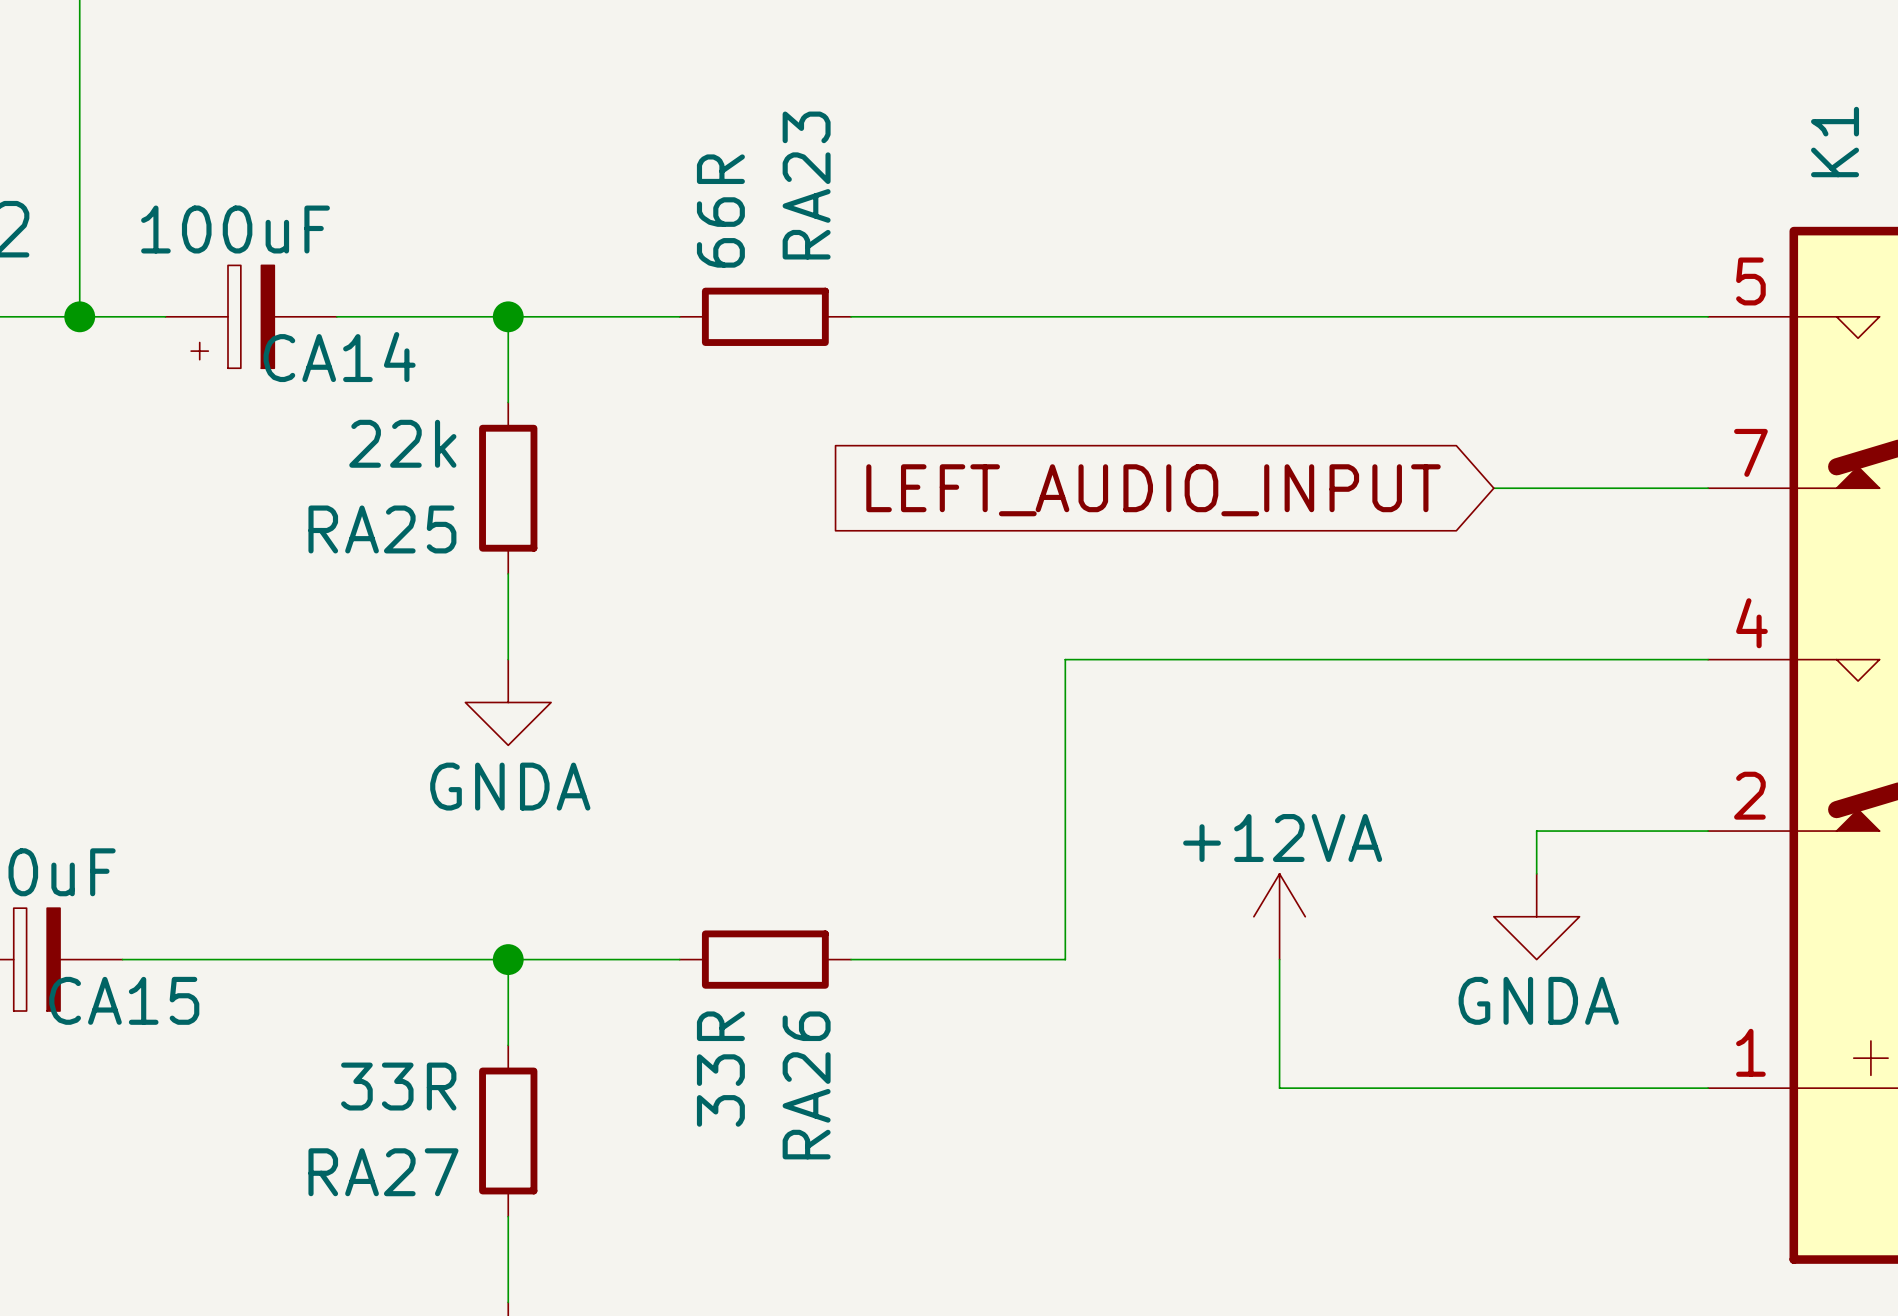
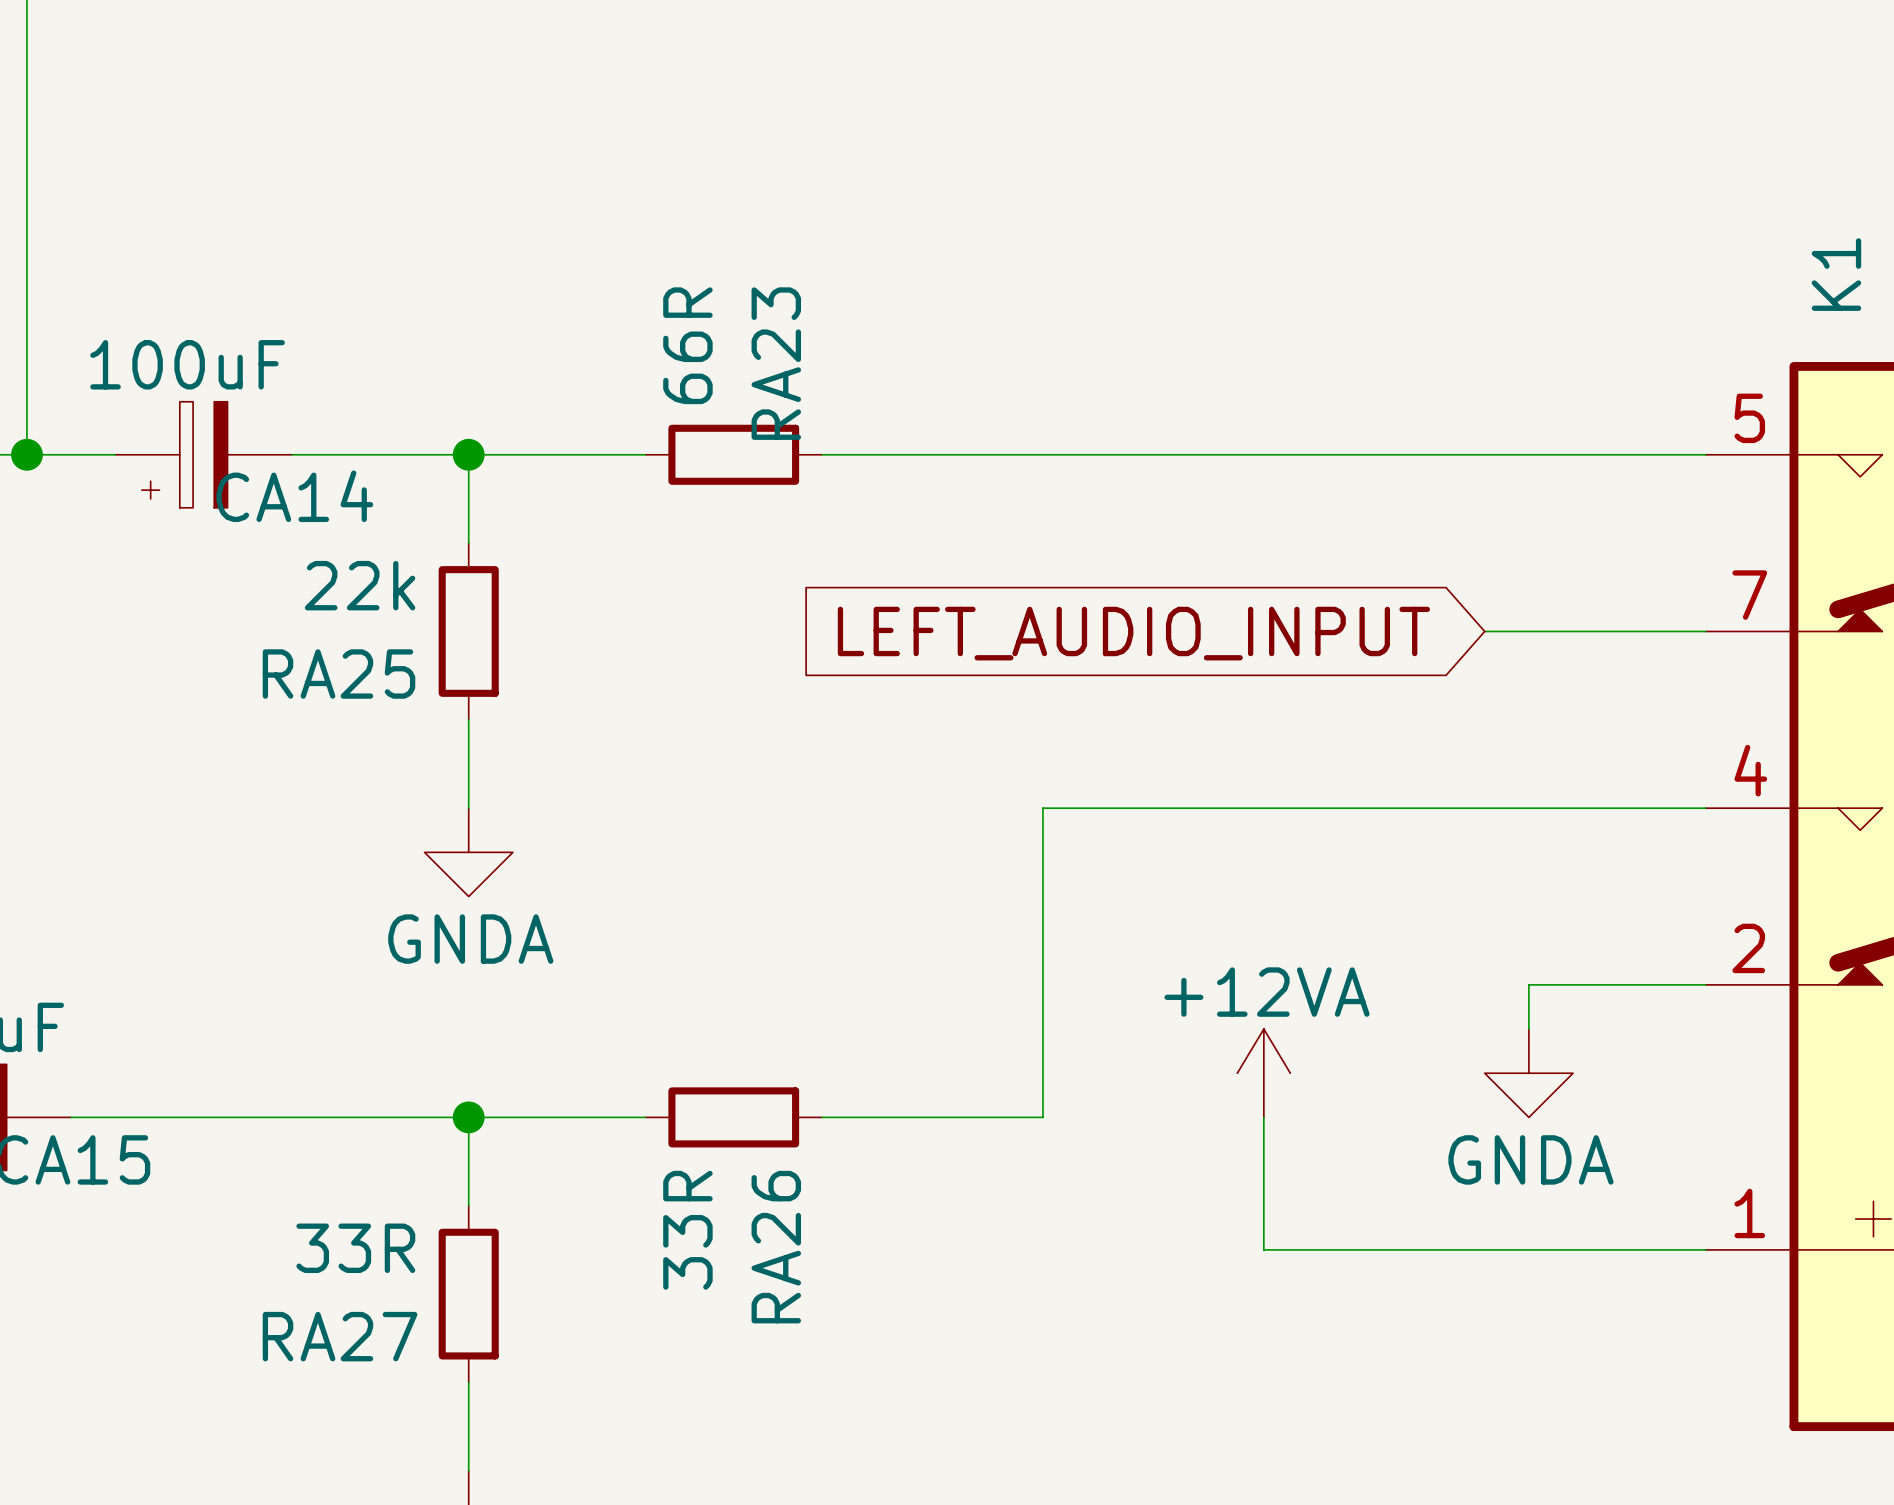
RA23 name position: RA23 (806, 185) -> RA23 (776, 363)

